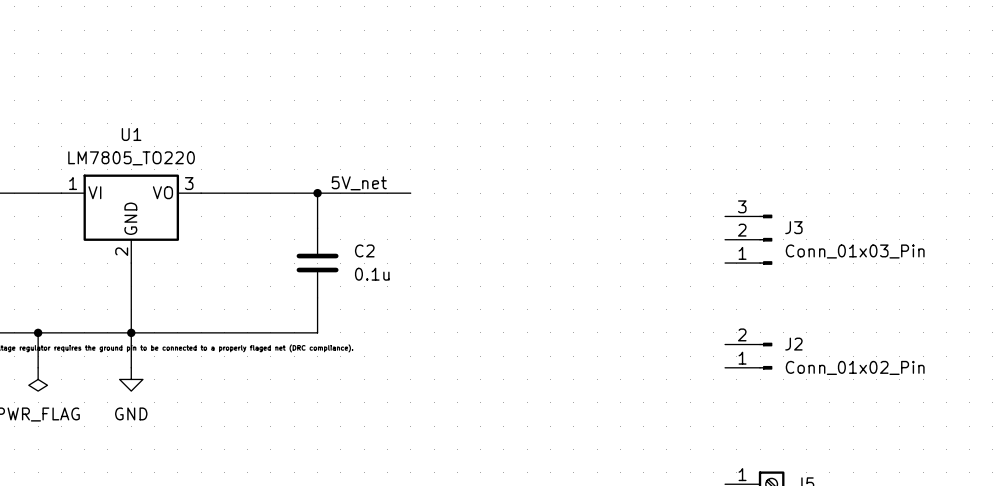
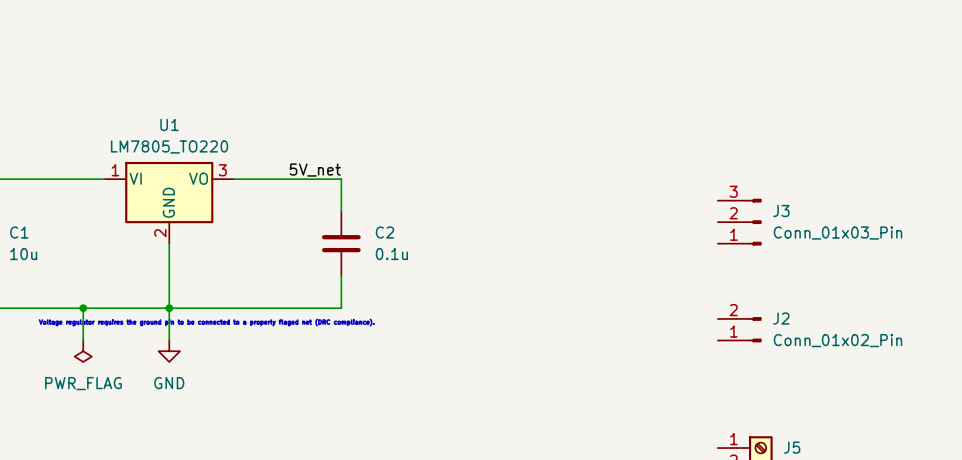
label position: 5V_net (359, 183) -> 5V_net (315, 170)
wire: (317, 193) (410, 193) -> none
junction: (317, 193) -> none

